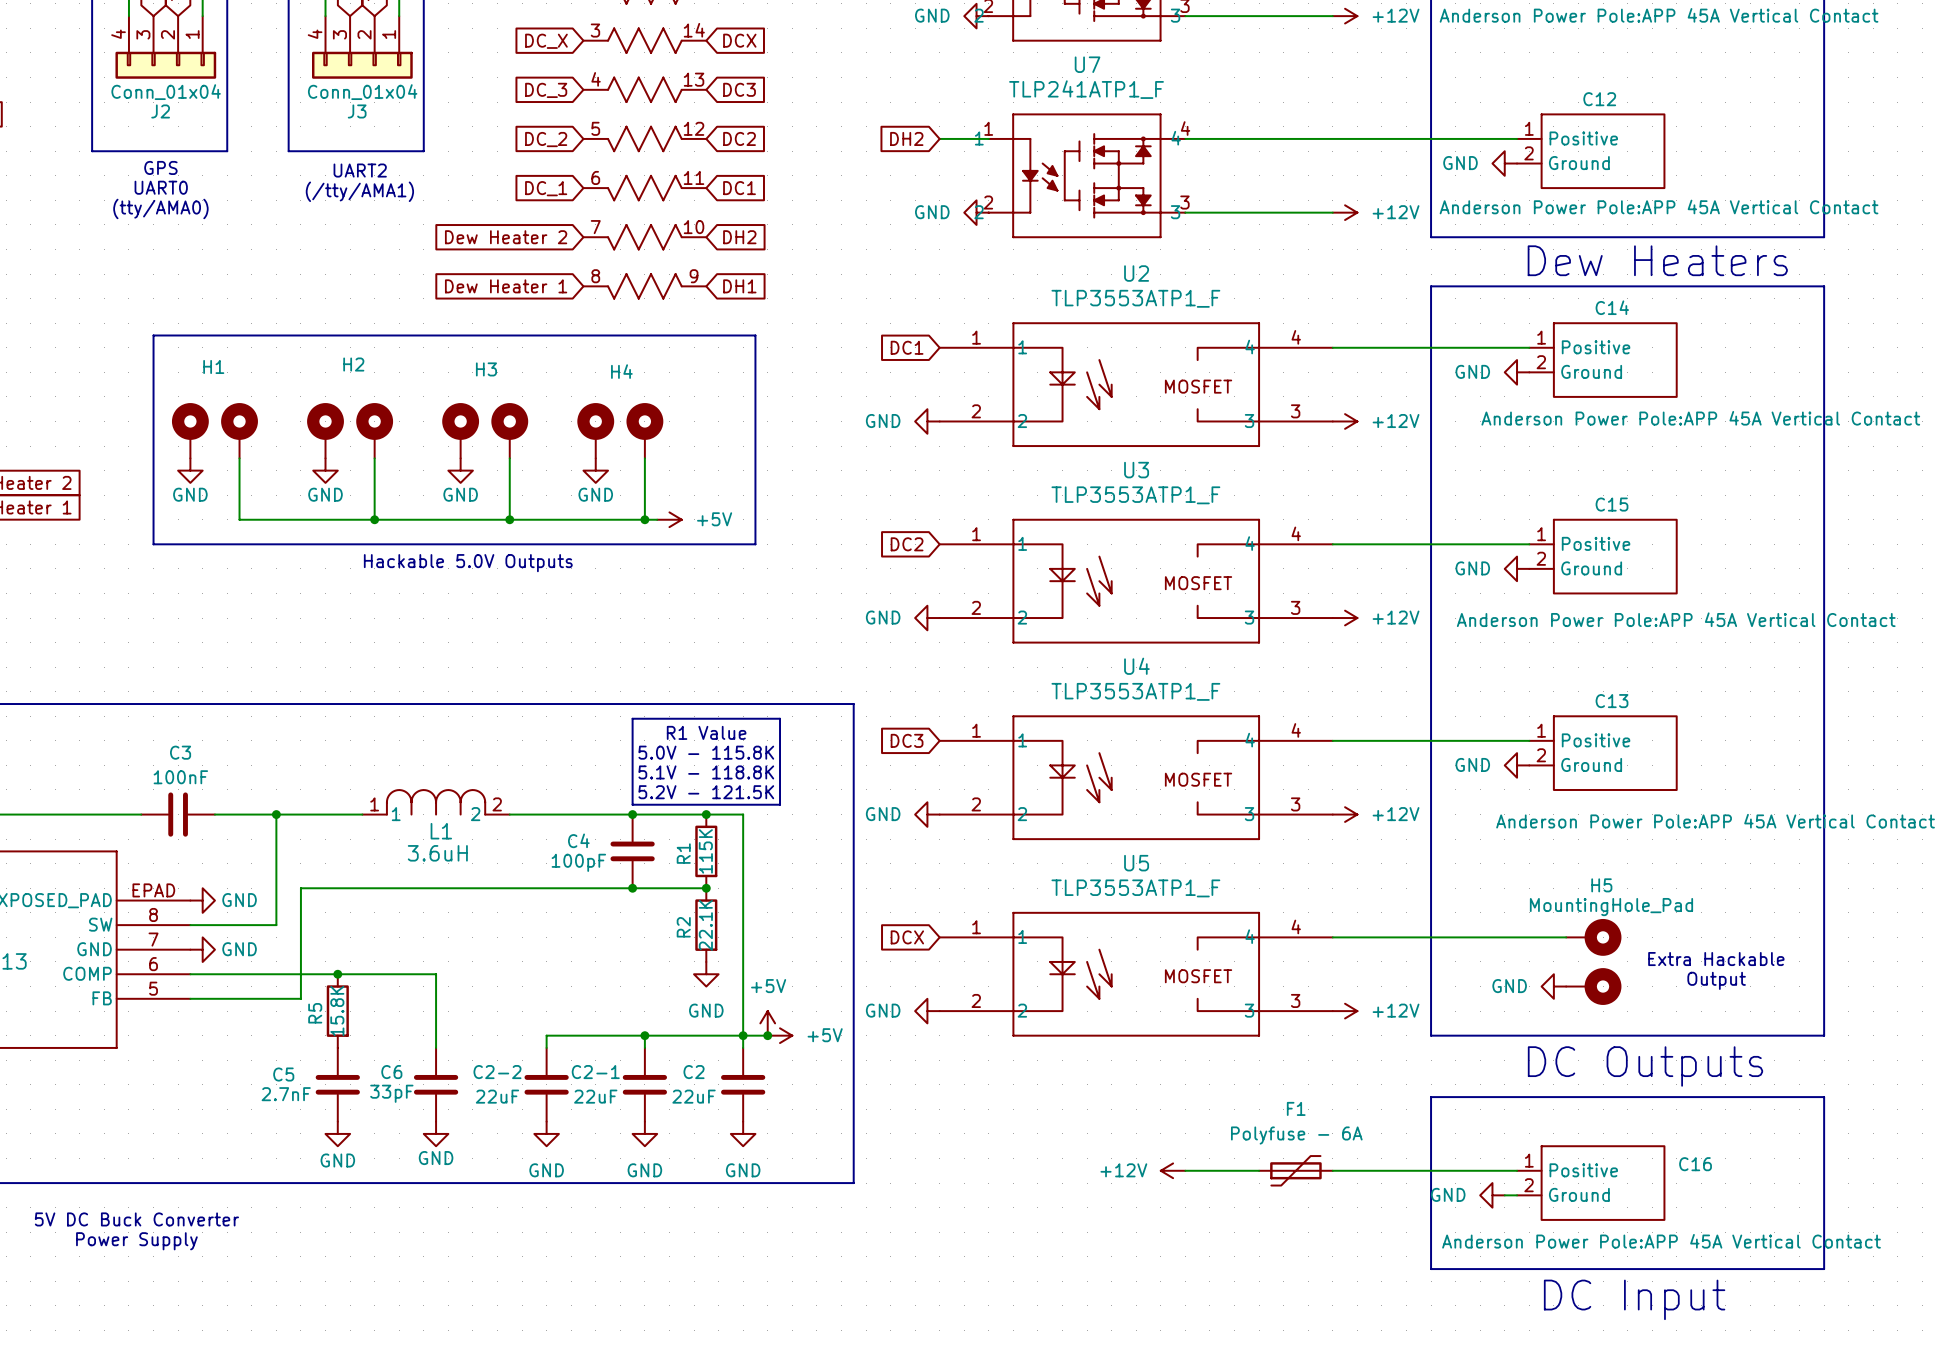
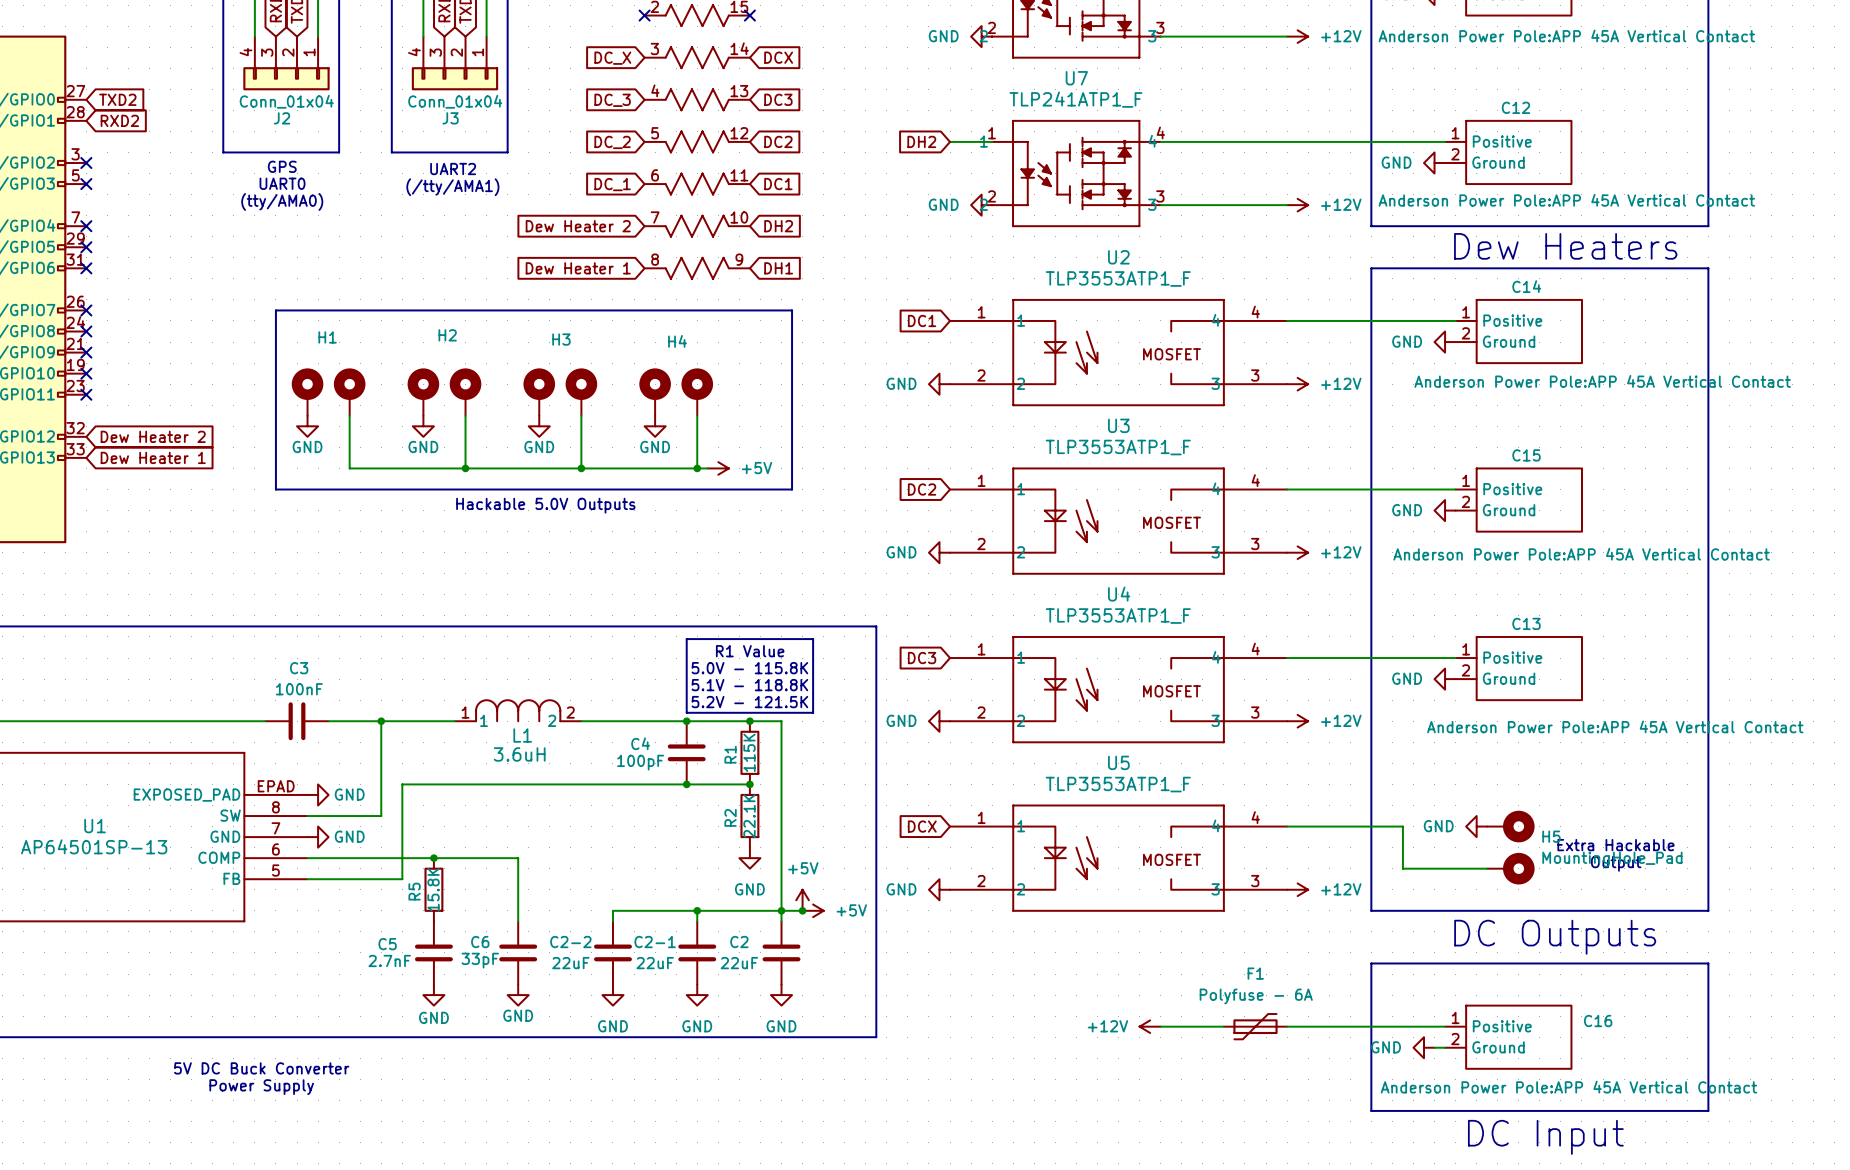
H5 name position: H5 (1601, 885) -> H5 (1551, 836)
H5 value position: MountingHole_Pad (1611, 907) -> MountingHole_Pad (1612, 859)
wire: (1467, 937) (1566, 937) -> (1402, 826) (1402, 868) (1487, 868)
power symbol position: GND (1553, 986) -> GND (1476, 826)

